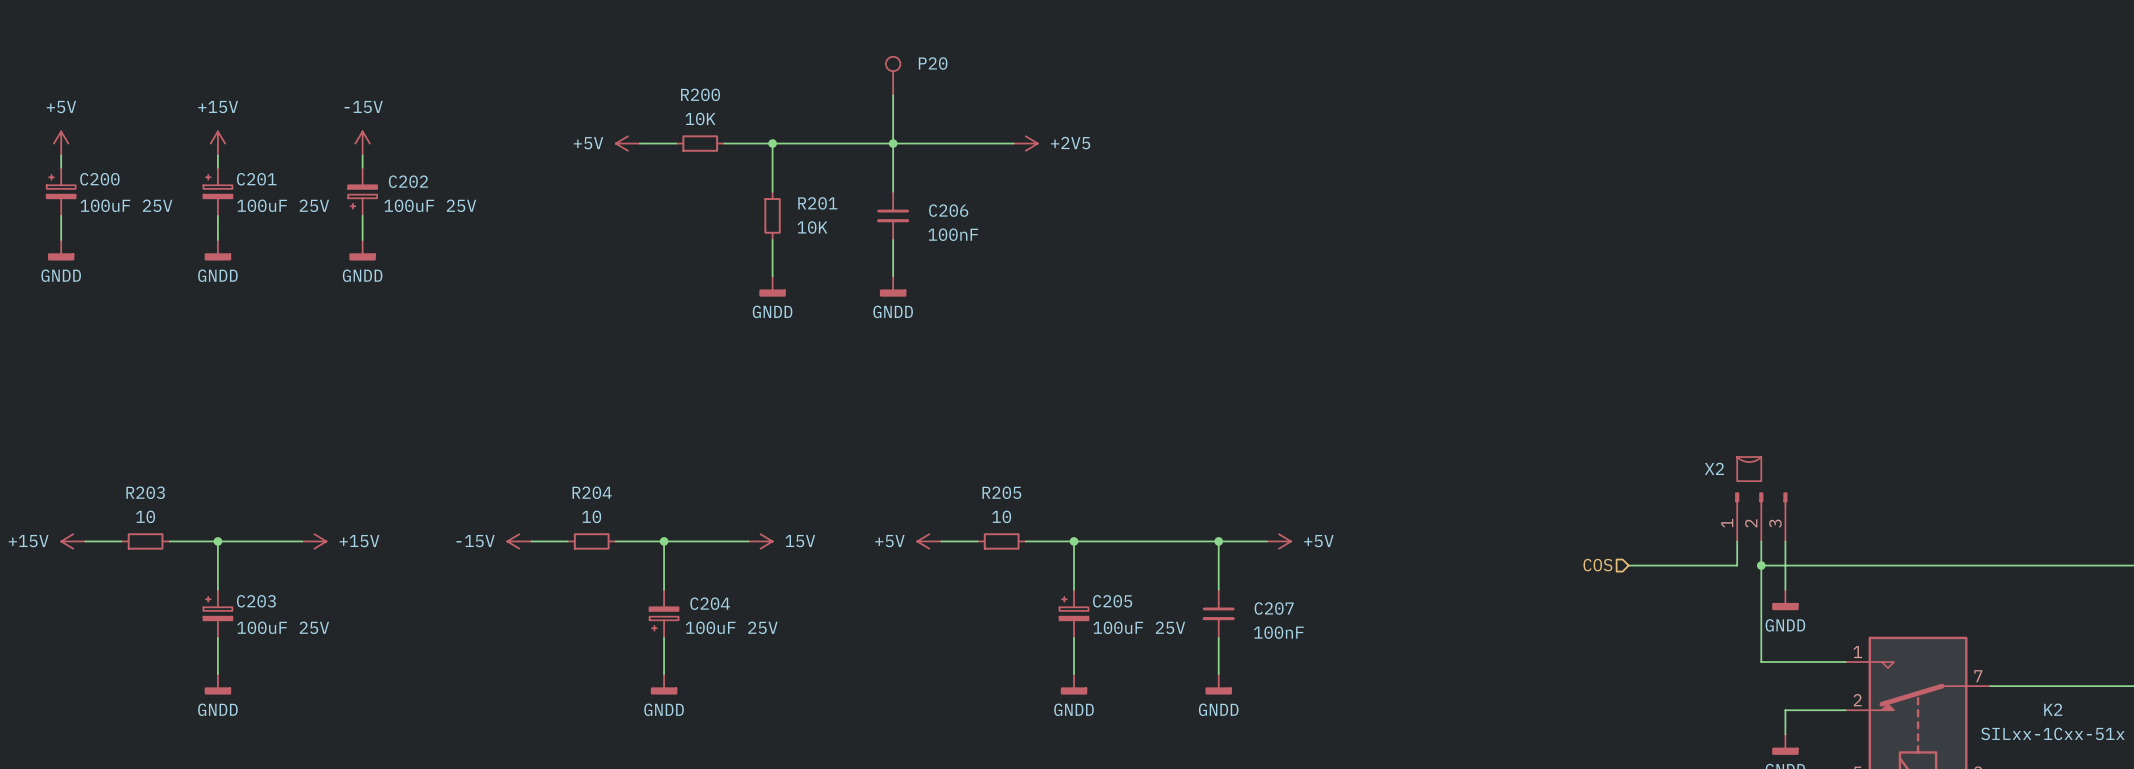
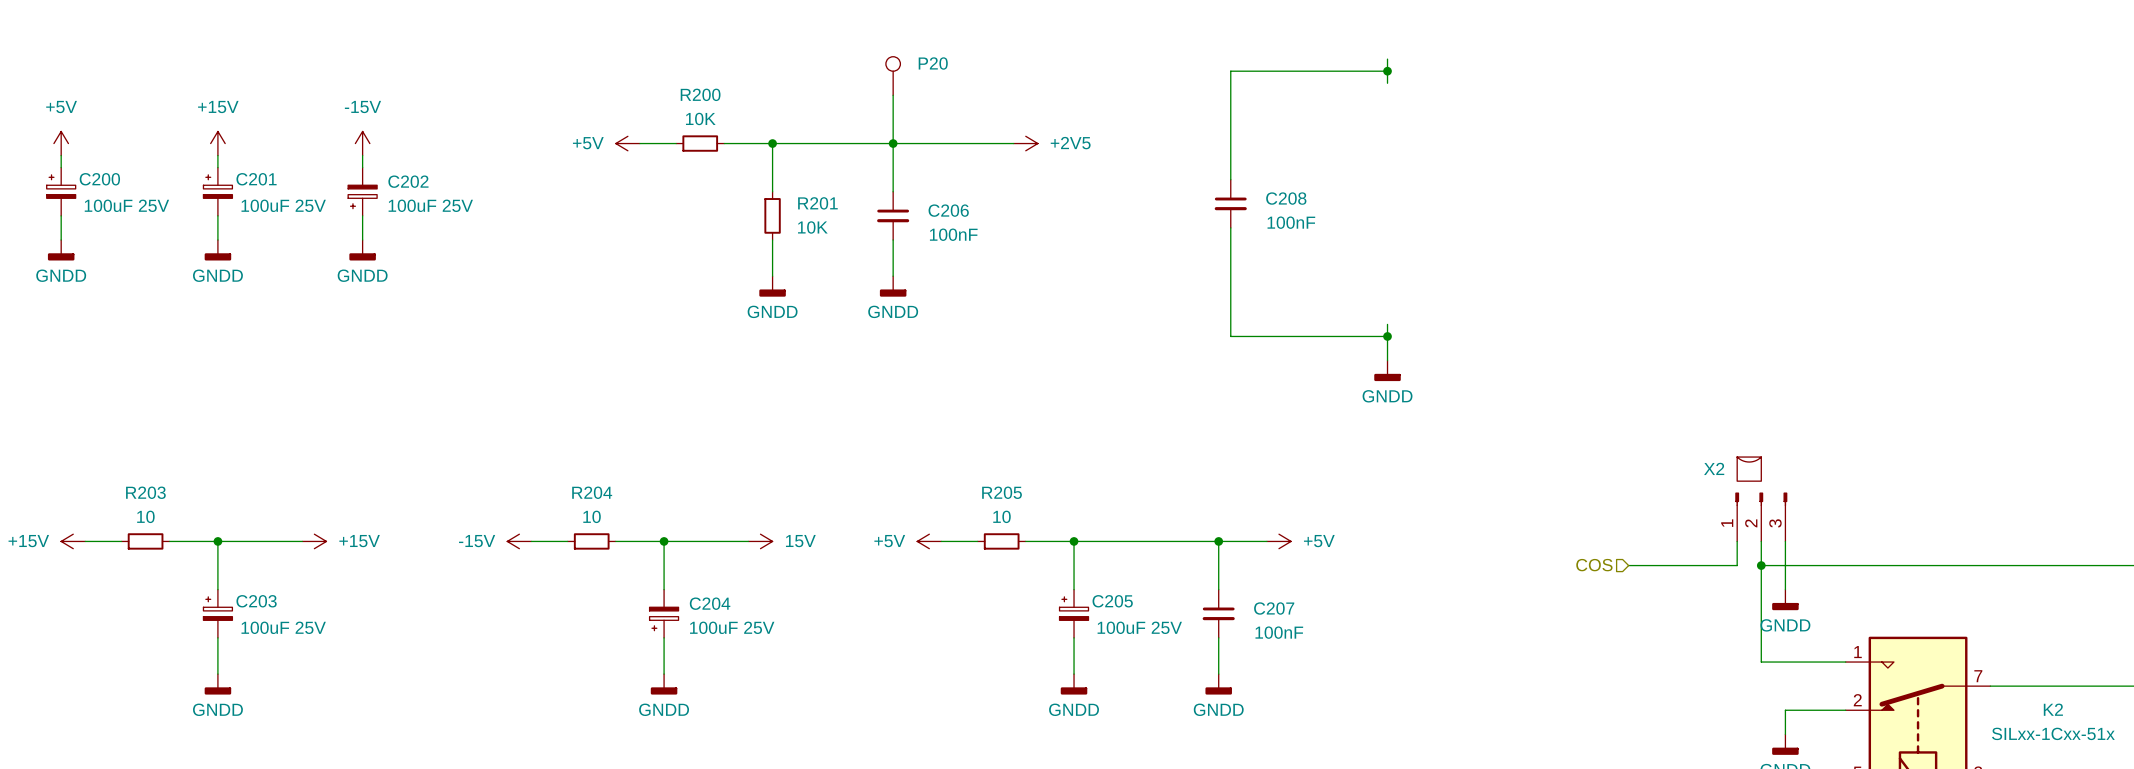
wire: none -> (1387, 59) (1387, 83)
wire: none -> (1387, 71) (1230, 71) (1230, 179)
junction: none -> (1387, 71)
C208: none -> 100nF (1230, 203)
wire: none -> (1230, 227) (1230, 336) (1387, 336)
wire: none -> (1387, 324) (1387, 360)
junction: none -> (1387, 336)
power symbol: none -> GNDD (1387, 370)

